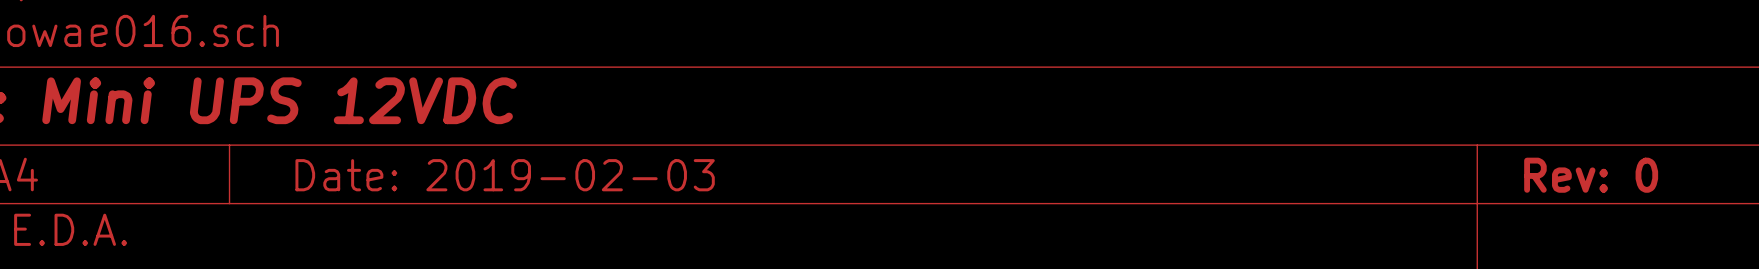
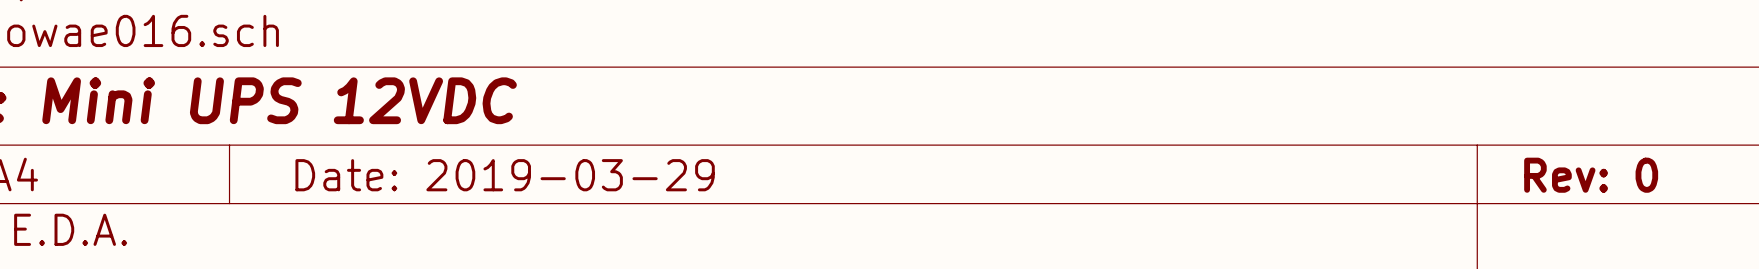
title block: Date: 2019-02-03 (505, 175) -> Date: 2019-03-29 (505, 175)

